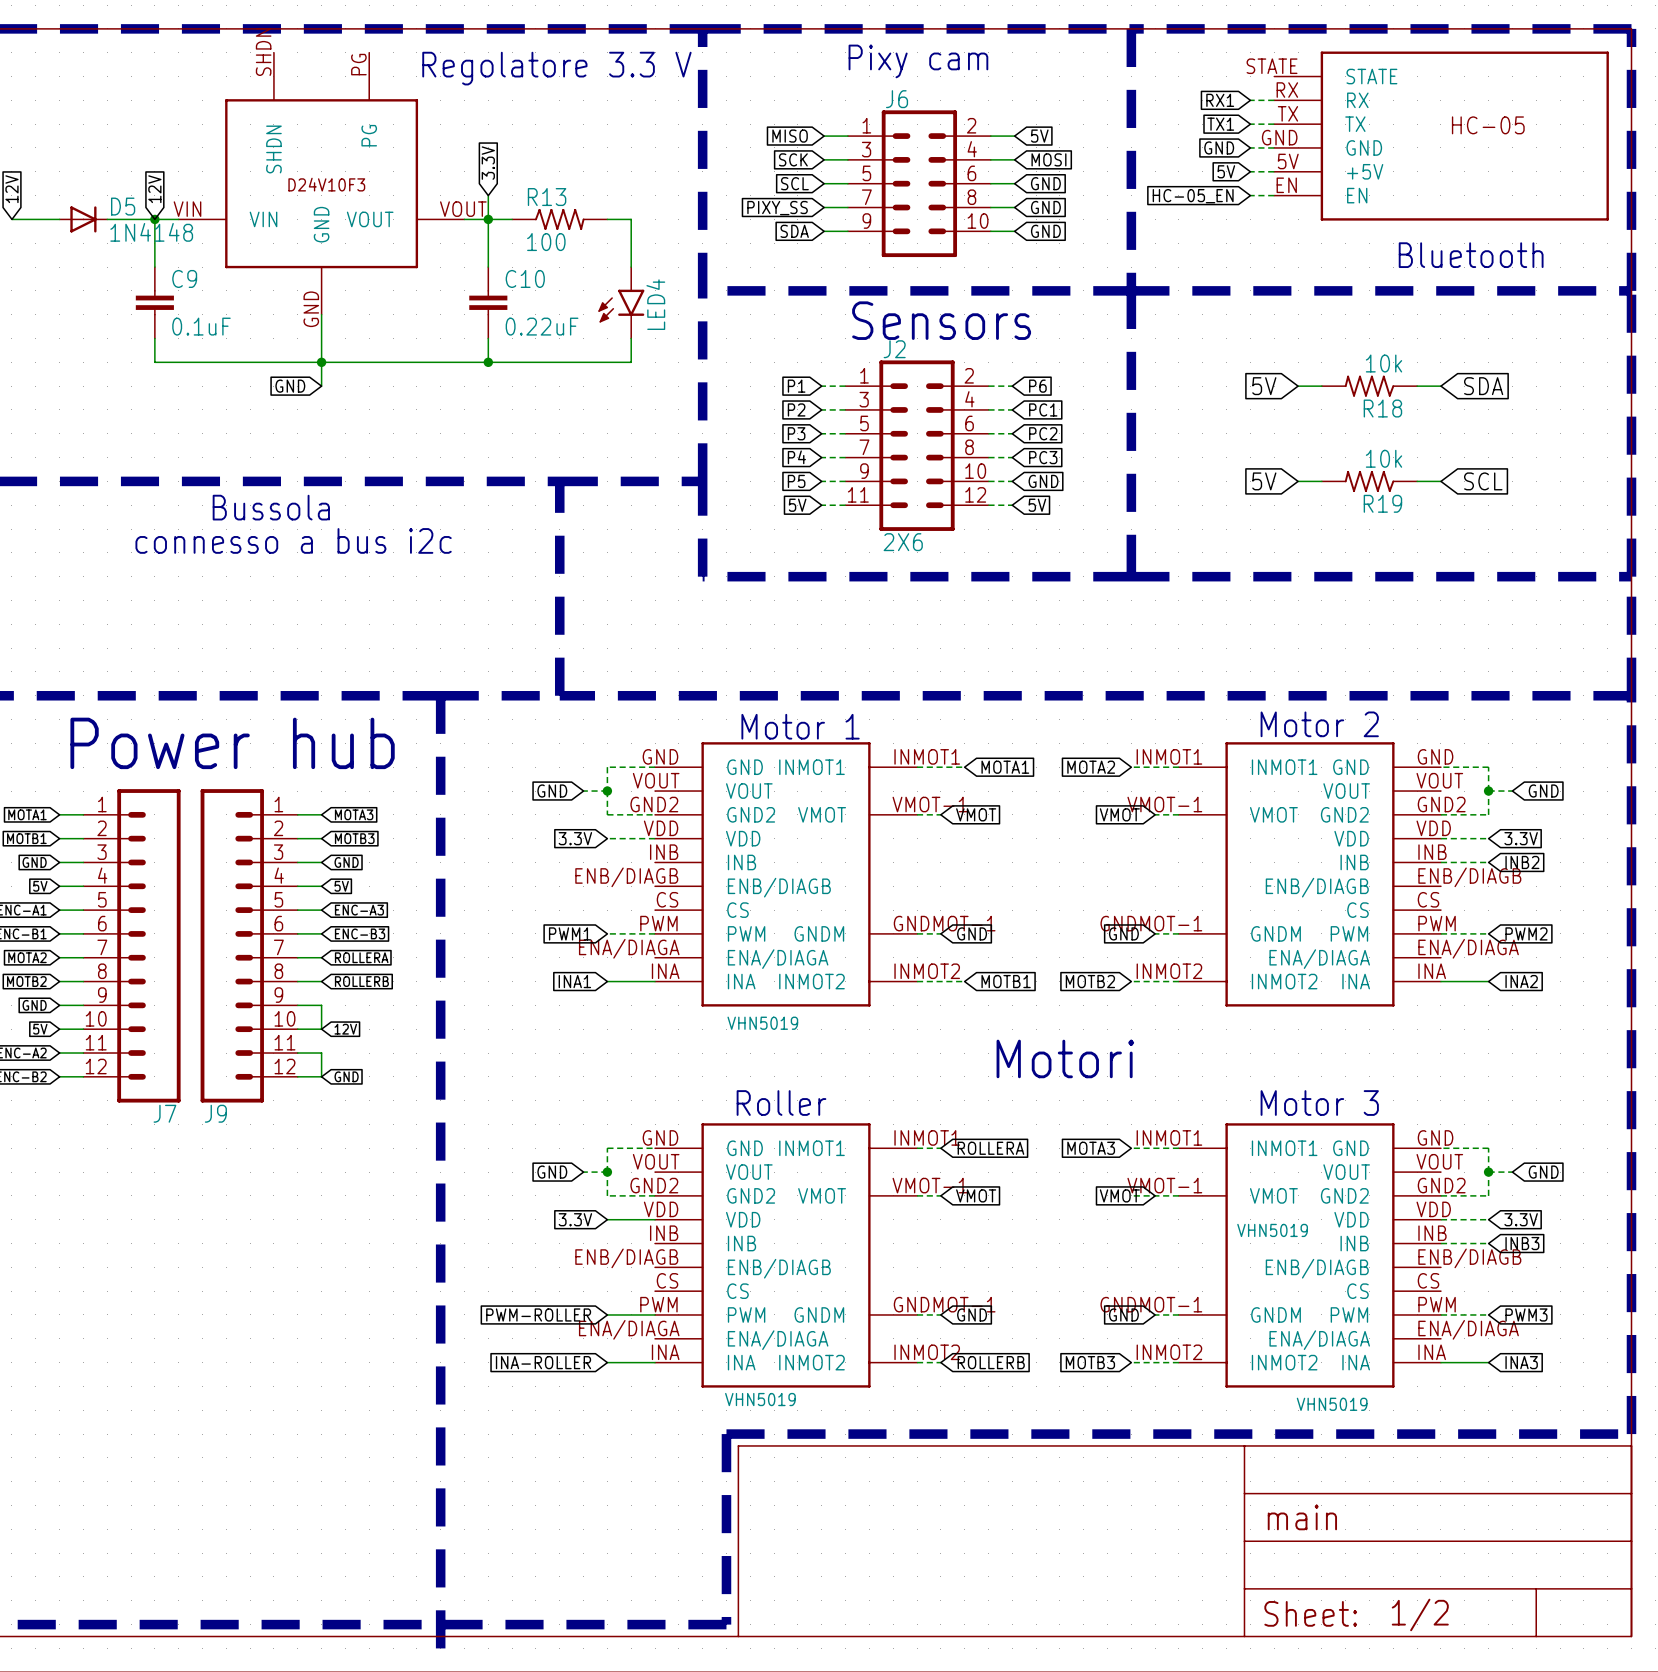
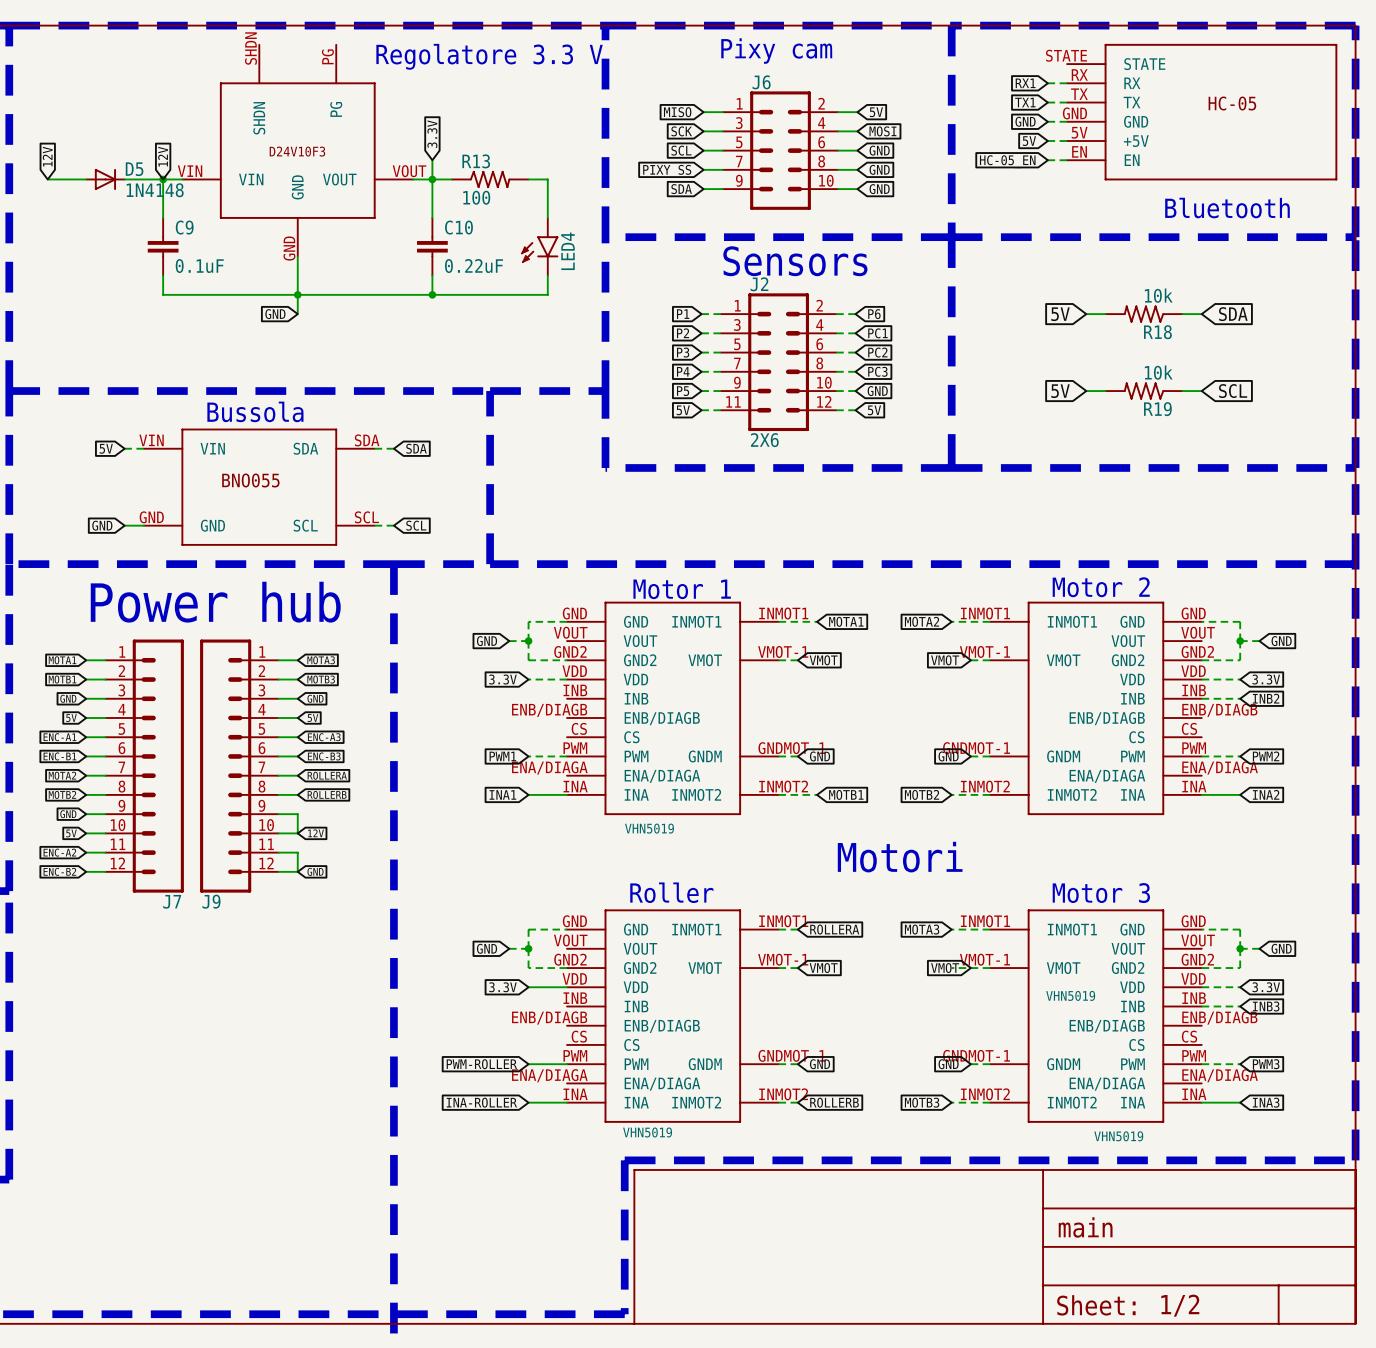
text: connesso a bus i2c (293, 540) -> none
global label: none -> 5V (106, 448)
wire: none -> (124, 448) (143, 448)
wire: none -> (374, 448) (393, 448)
global label: none -> SDA (416, 448)
part: none -> (259, 487)
global label: none -> GND (102, 525)
wire: none -> (124, 525) (143, 525)
wire: none -> (374, 525) (393, 525)
global label: none -> SCL (416, 525)

